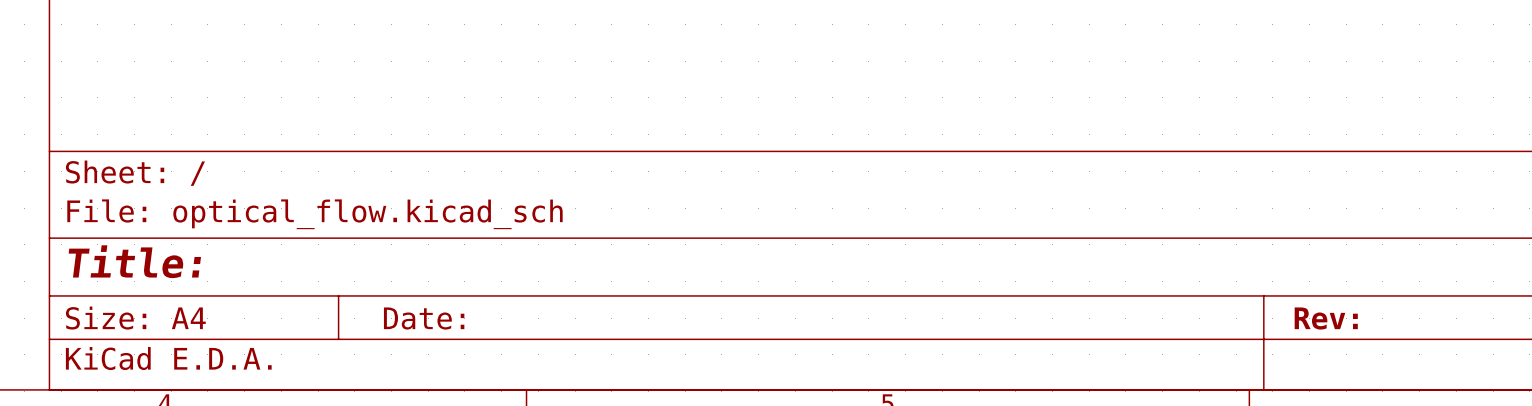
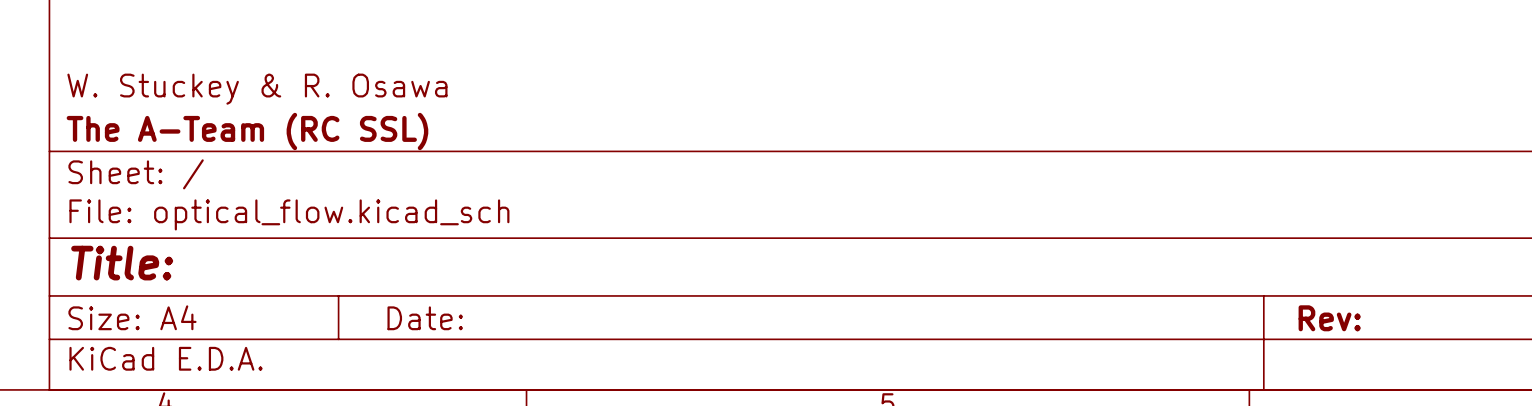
title block: none -> W. Stuckey & R. Osawa (257, 89)
title block: none -> The A-Team (RC SSL) (247, 131)

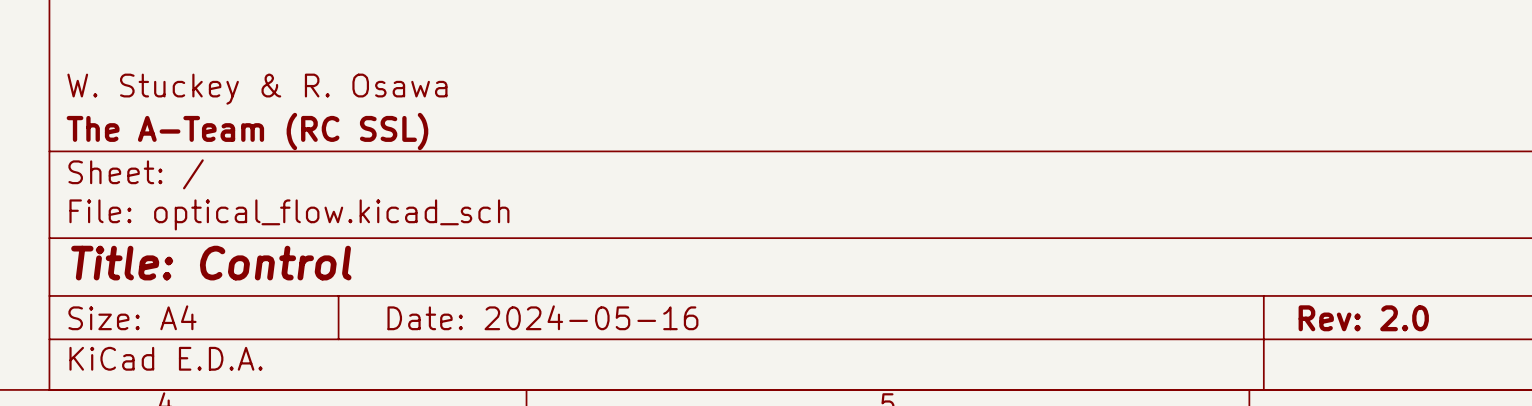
title block: Title: (122, 263) -> Title: Control (211, 263)
title block: Date: (425, 318) -> Date: 2024-05-16 (542, 317)
title block: Rev: (1329, 318) -> Rev: 2.0 (1363, 318)

